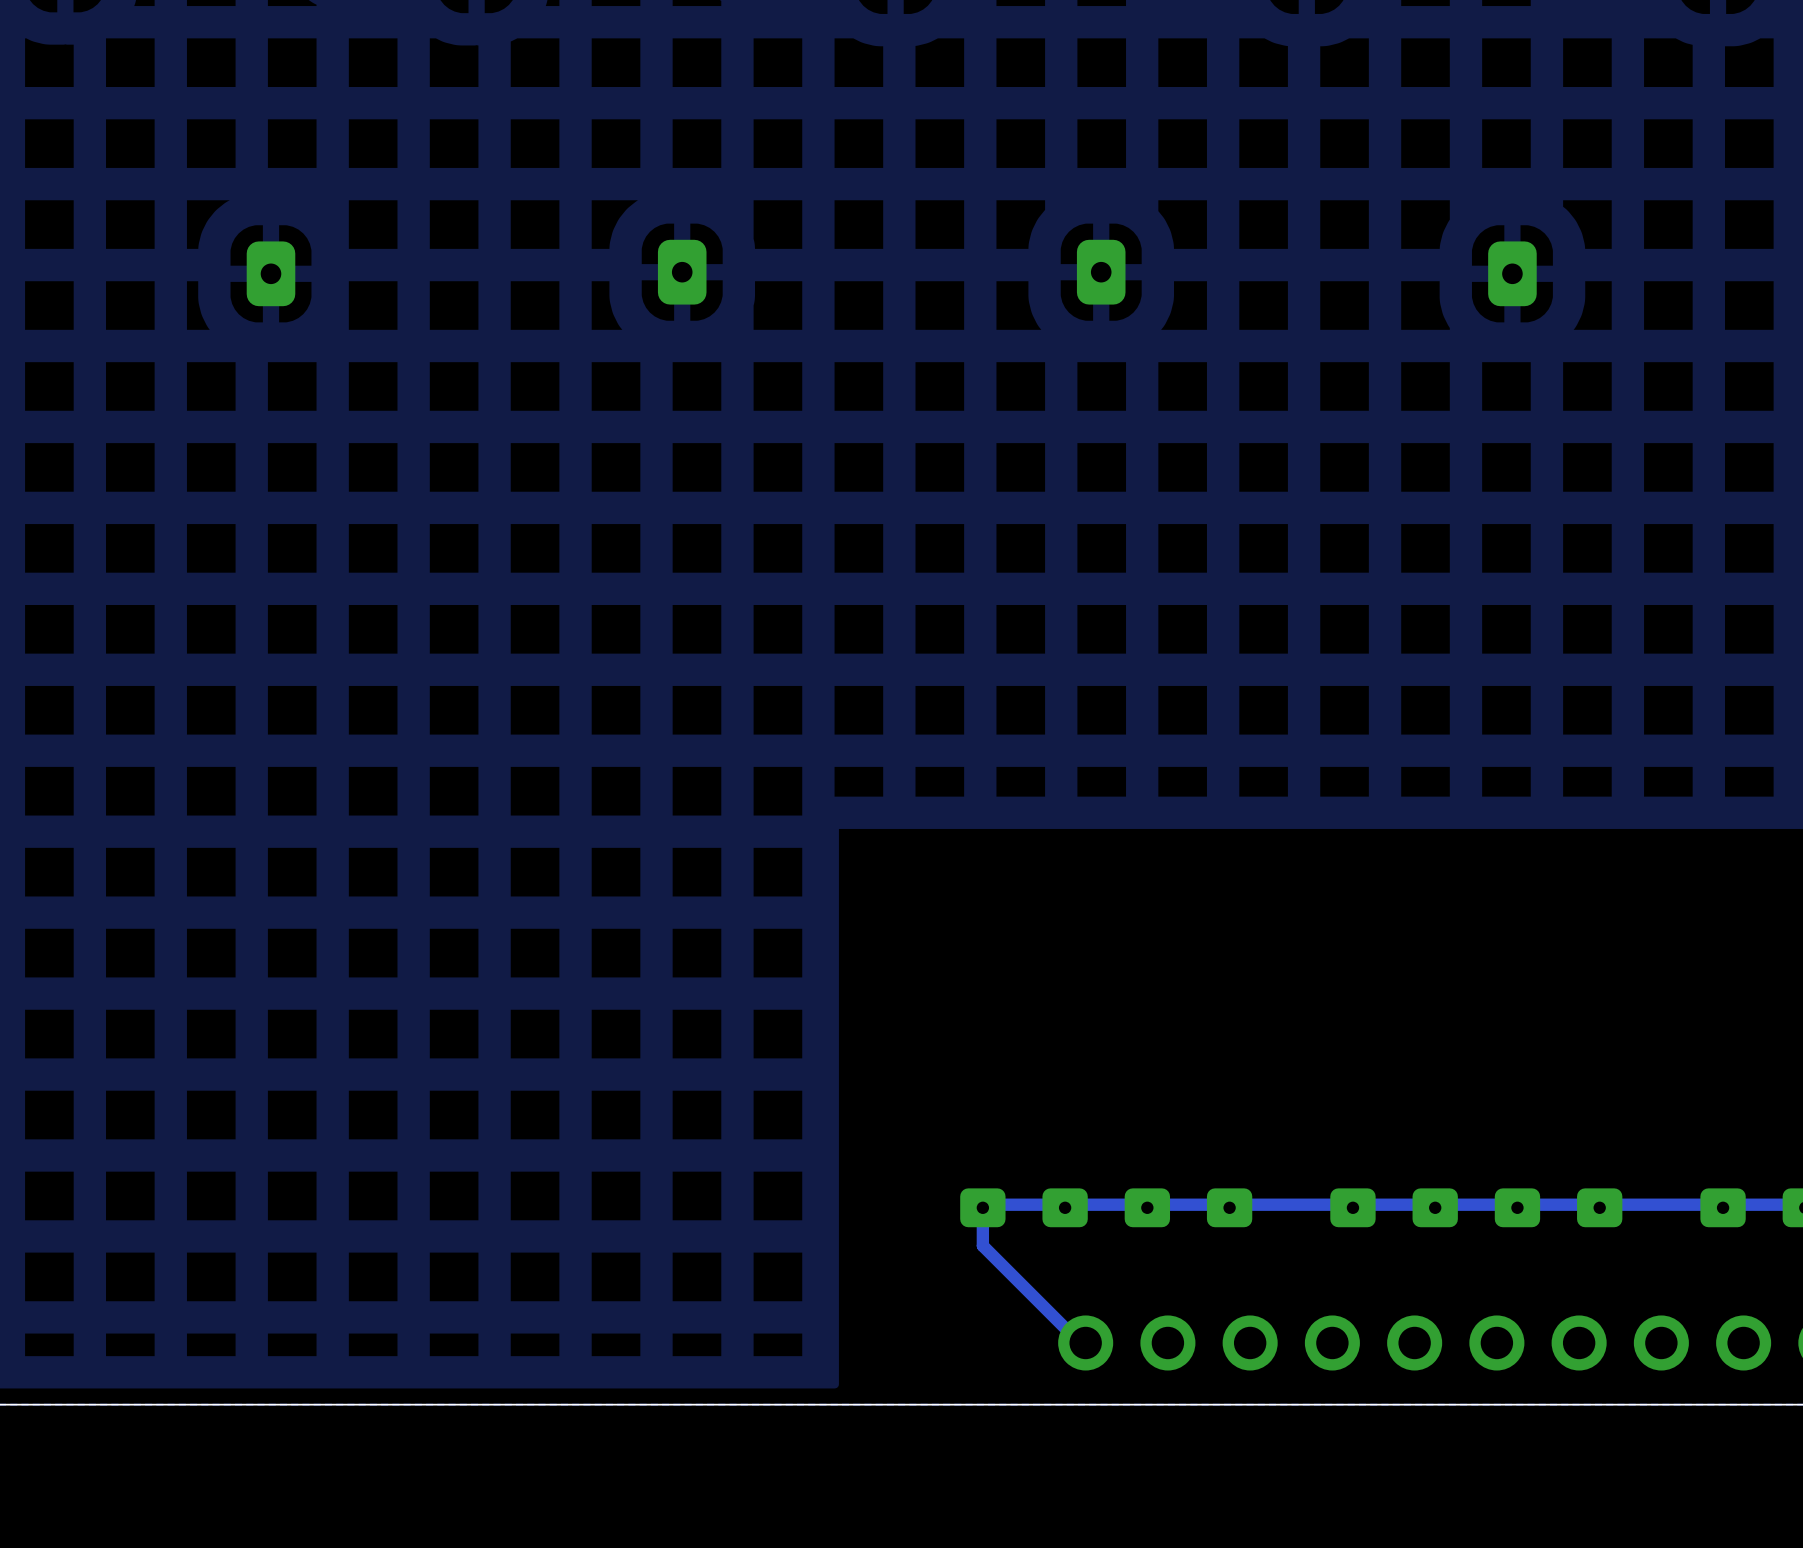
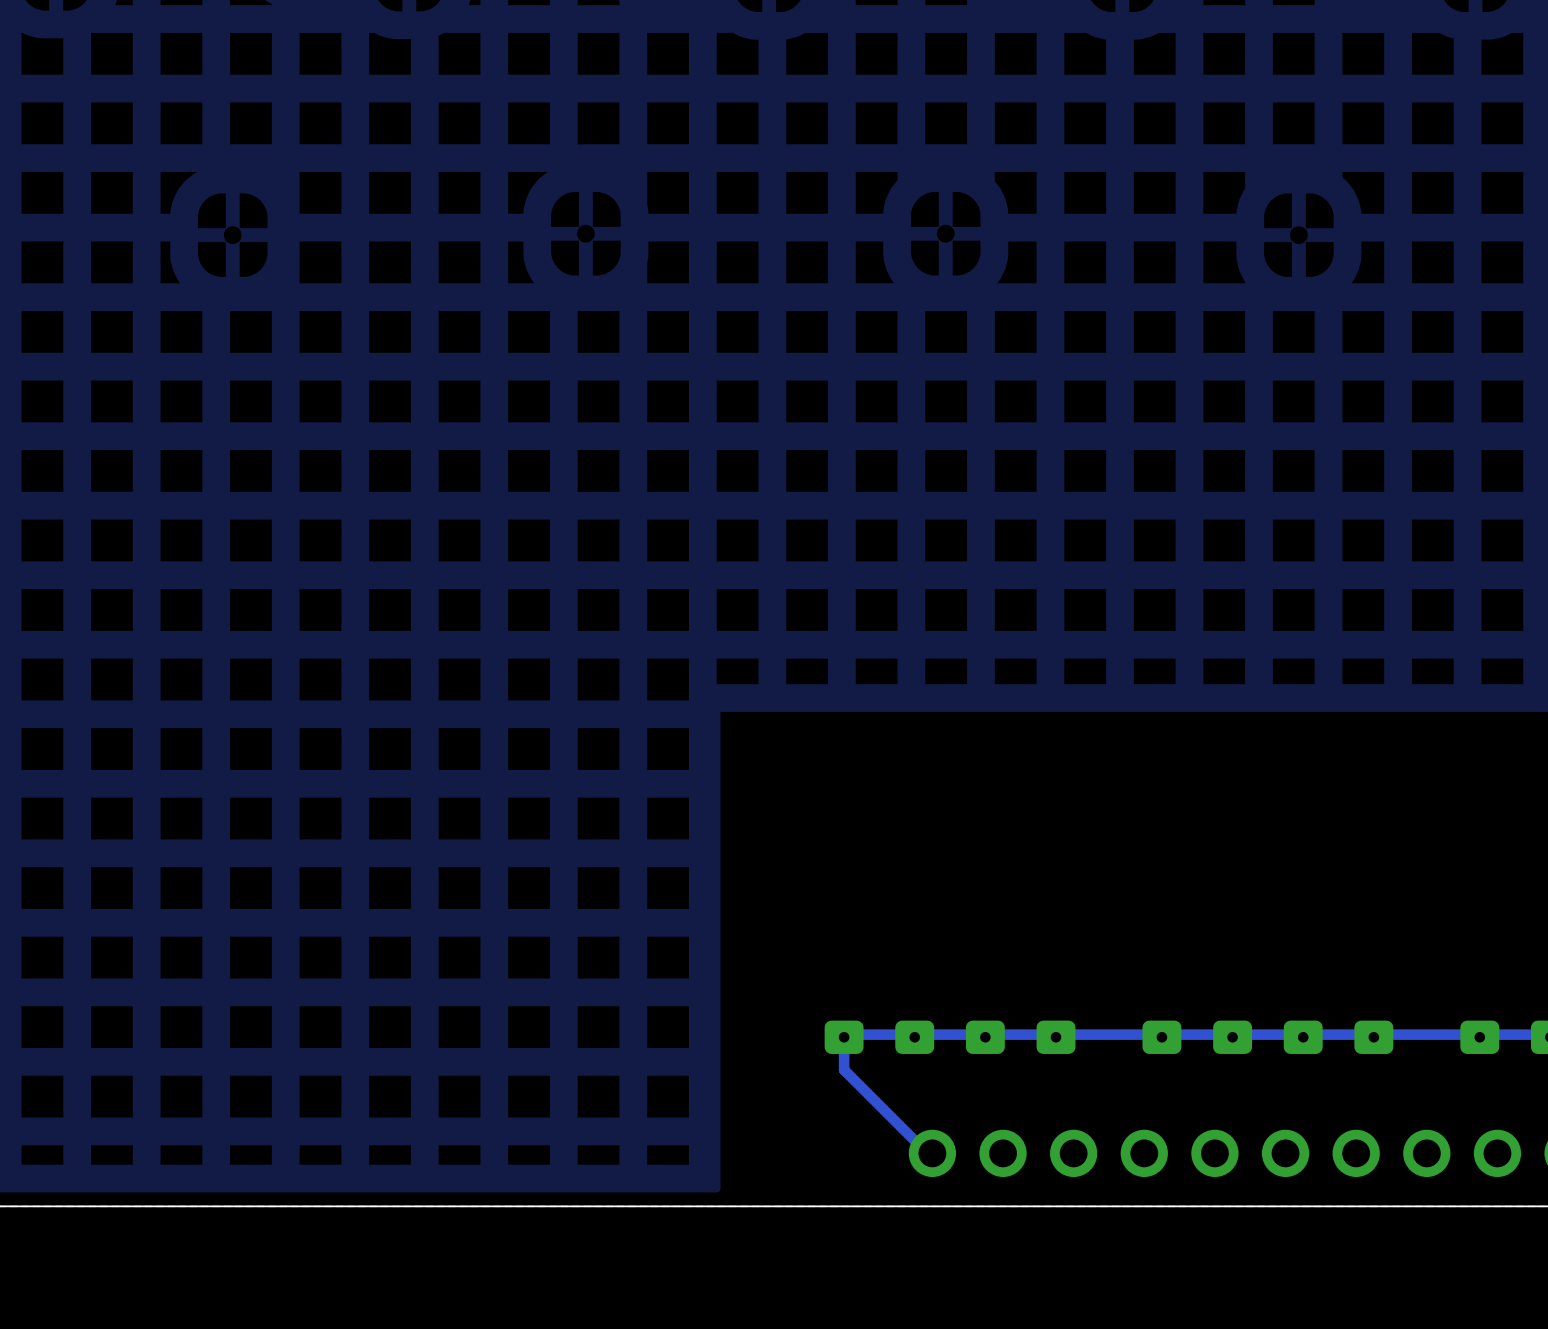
part: (682, 272) -> none
part: (1101, 272) -> none
part: (270, 273) -> none
part: (1512, 273) -> none

